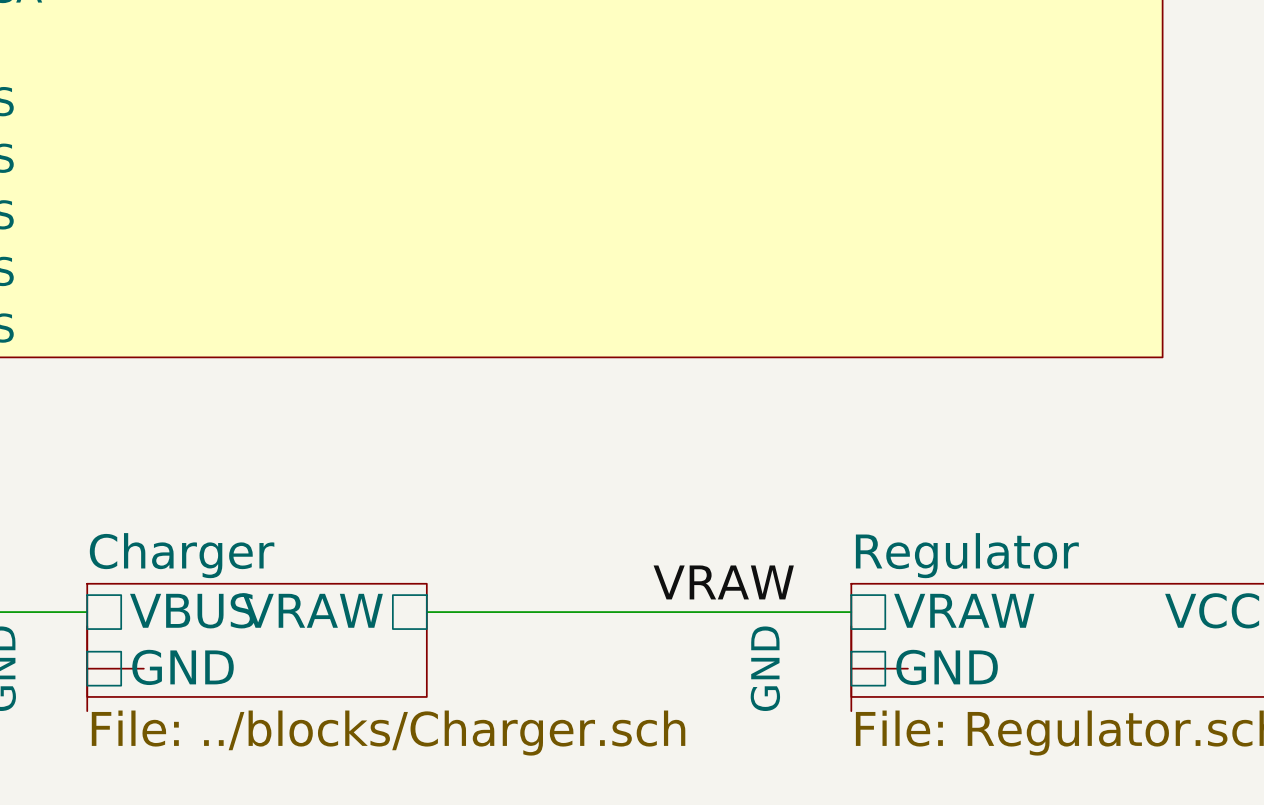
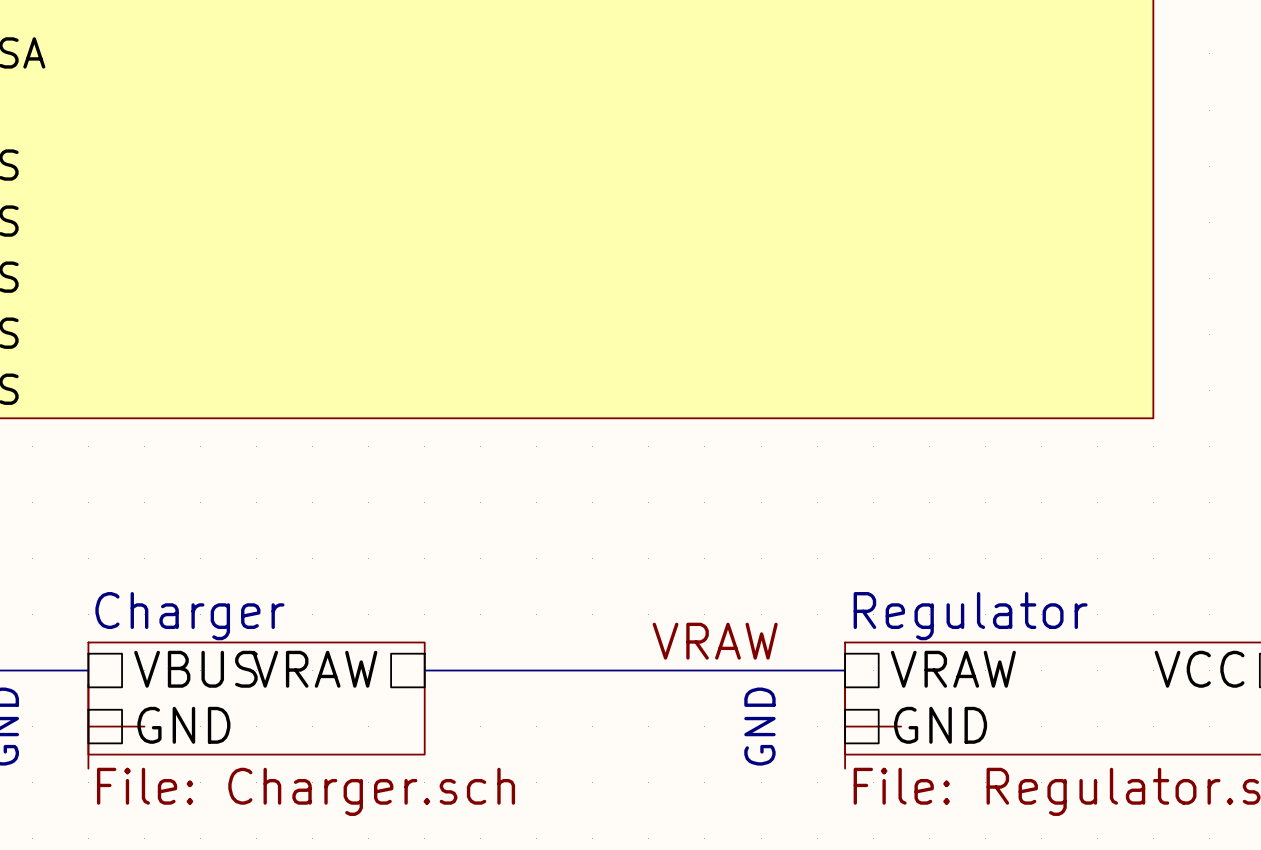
sheet Charger value: File: ../blocks/Charger.sch (388, 733) -> File: Charger.sch (306, 791)

